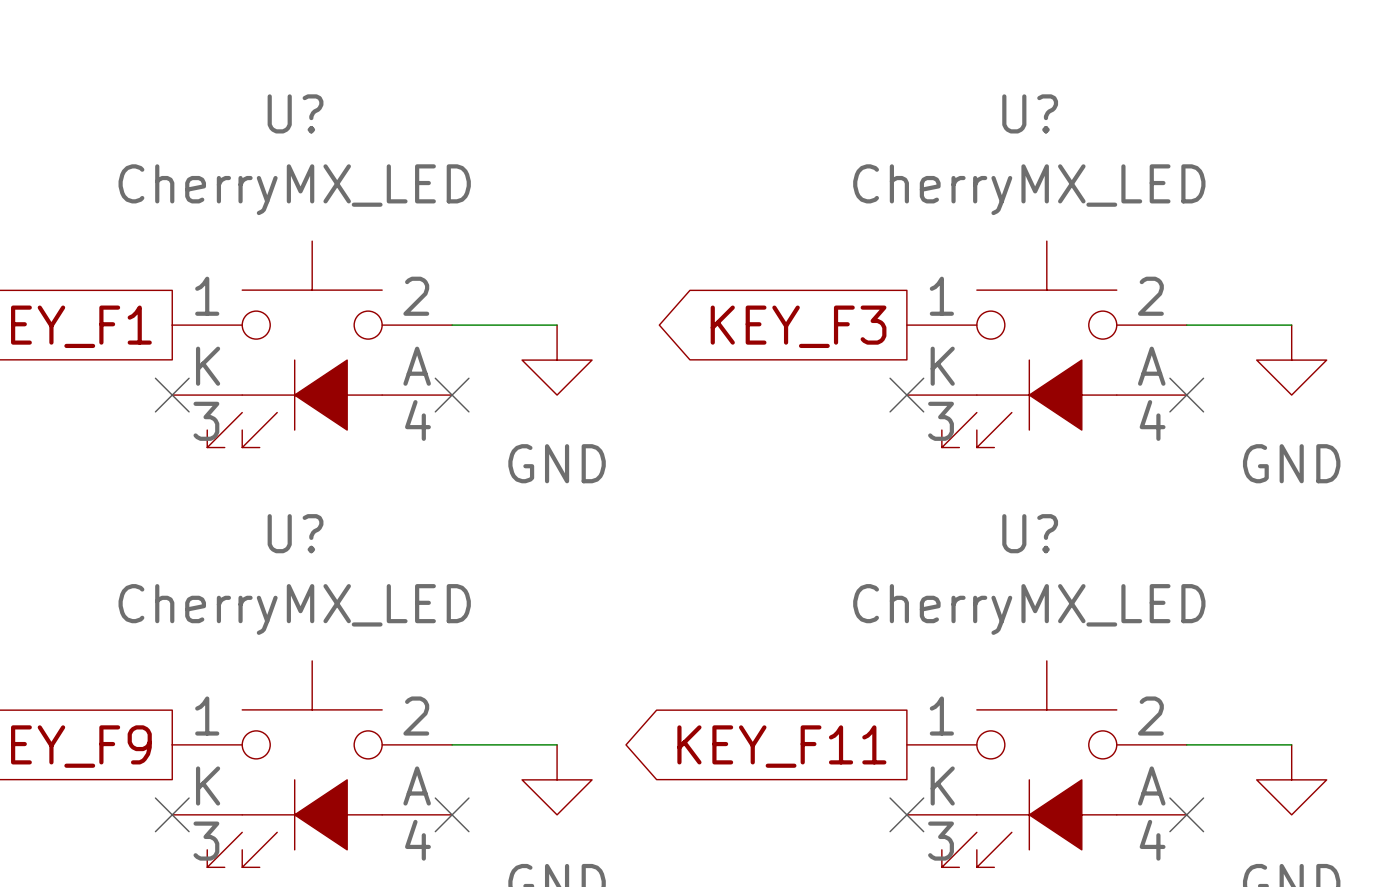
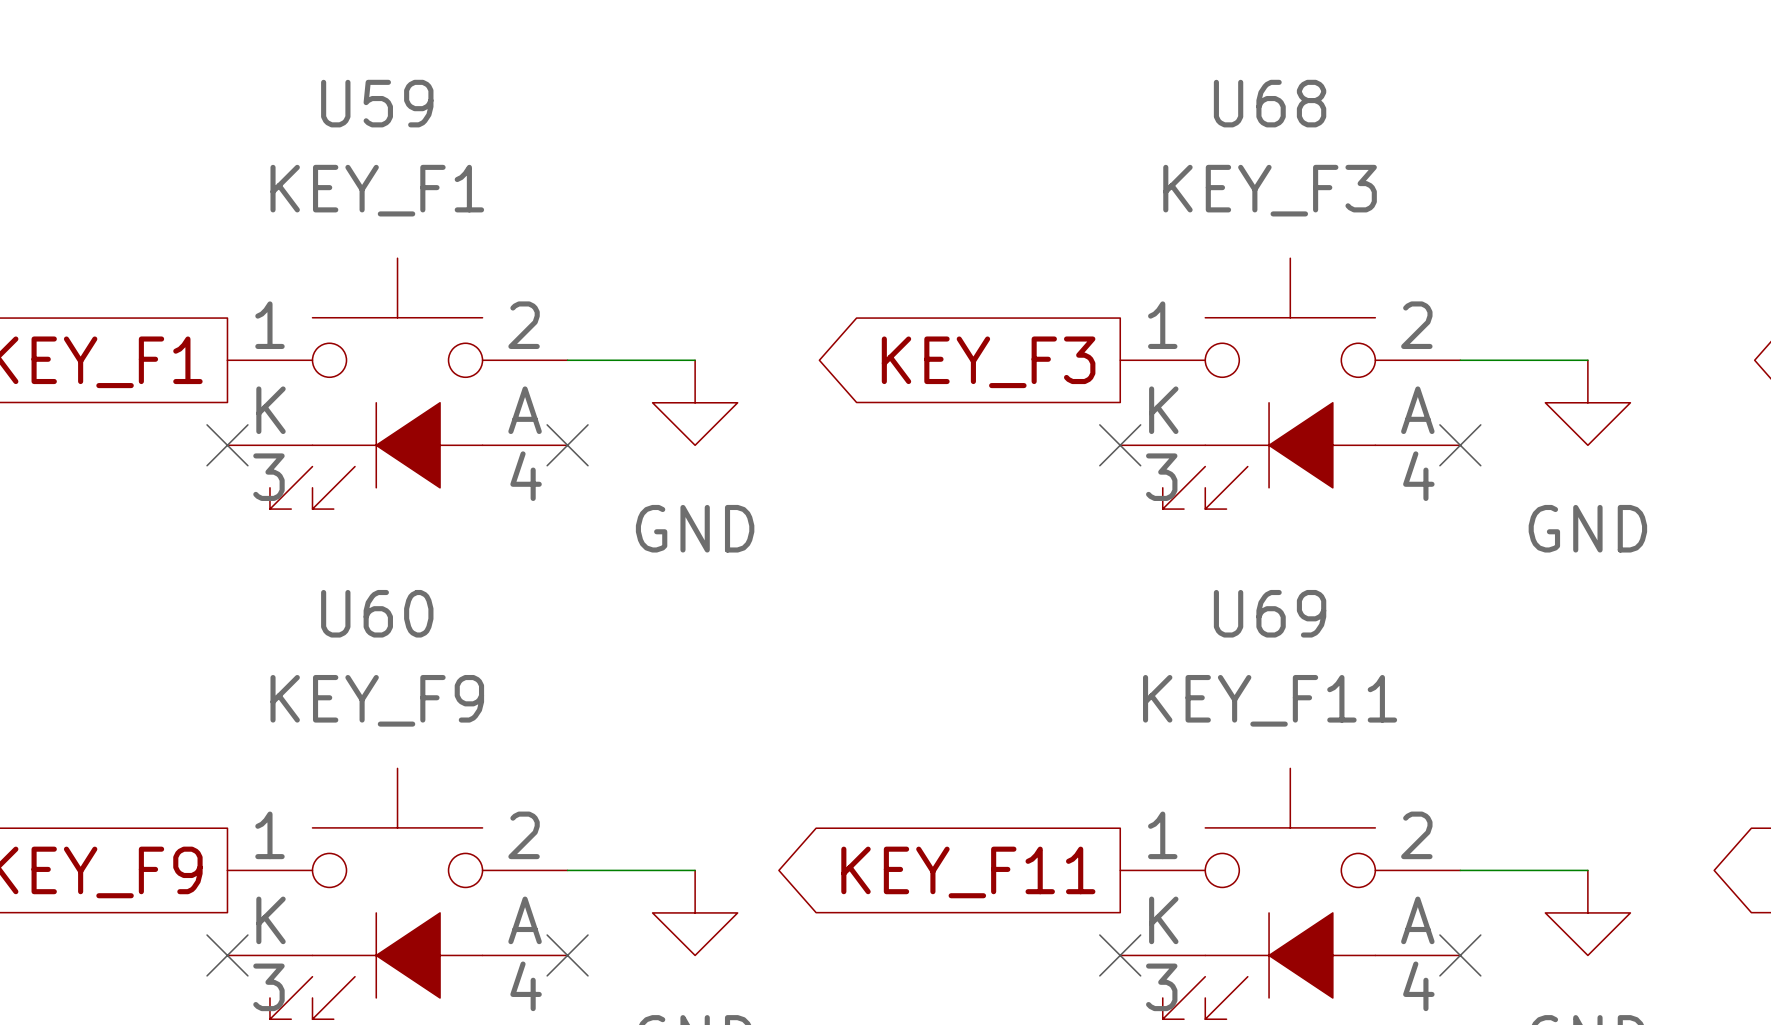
U? name: U? (295, 113) -> U59 (377, 103)
U? name: U? (1030, 113) -> U68 (1270, 103)
U? value: CherryMX_LED (294, 189) -> KEY_F1 (377, 190)
U? value: CherryMX_LED (1029, 189) -> KEY_F3 (1270, 190)
U? name: U? (295, 533) -> U60 (377, 613)
U? name: U? (1030, 533) -> U69 (1270, 613)
U? value: CherryMX_LED (294, 609) -> KEY_F9 (377, 700)
U? value: CherryMX_LED (1029, 609) -> KEY_F11 (1270, 700)

